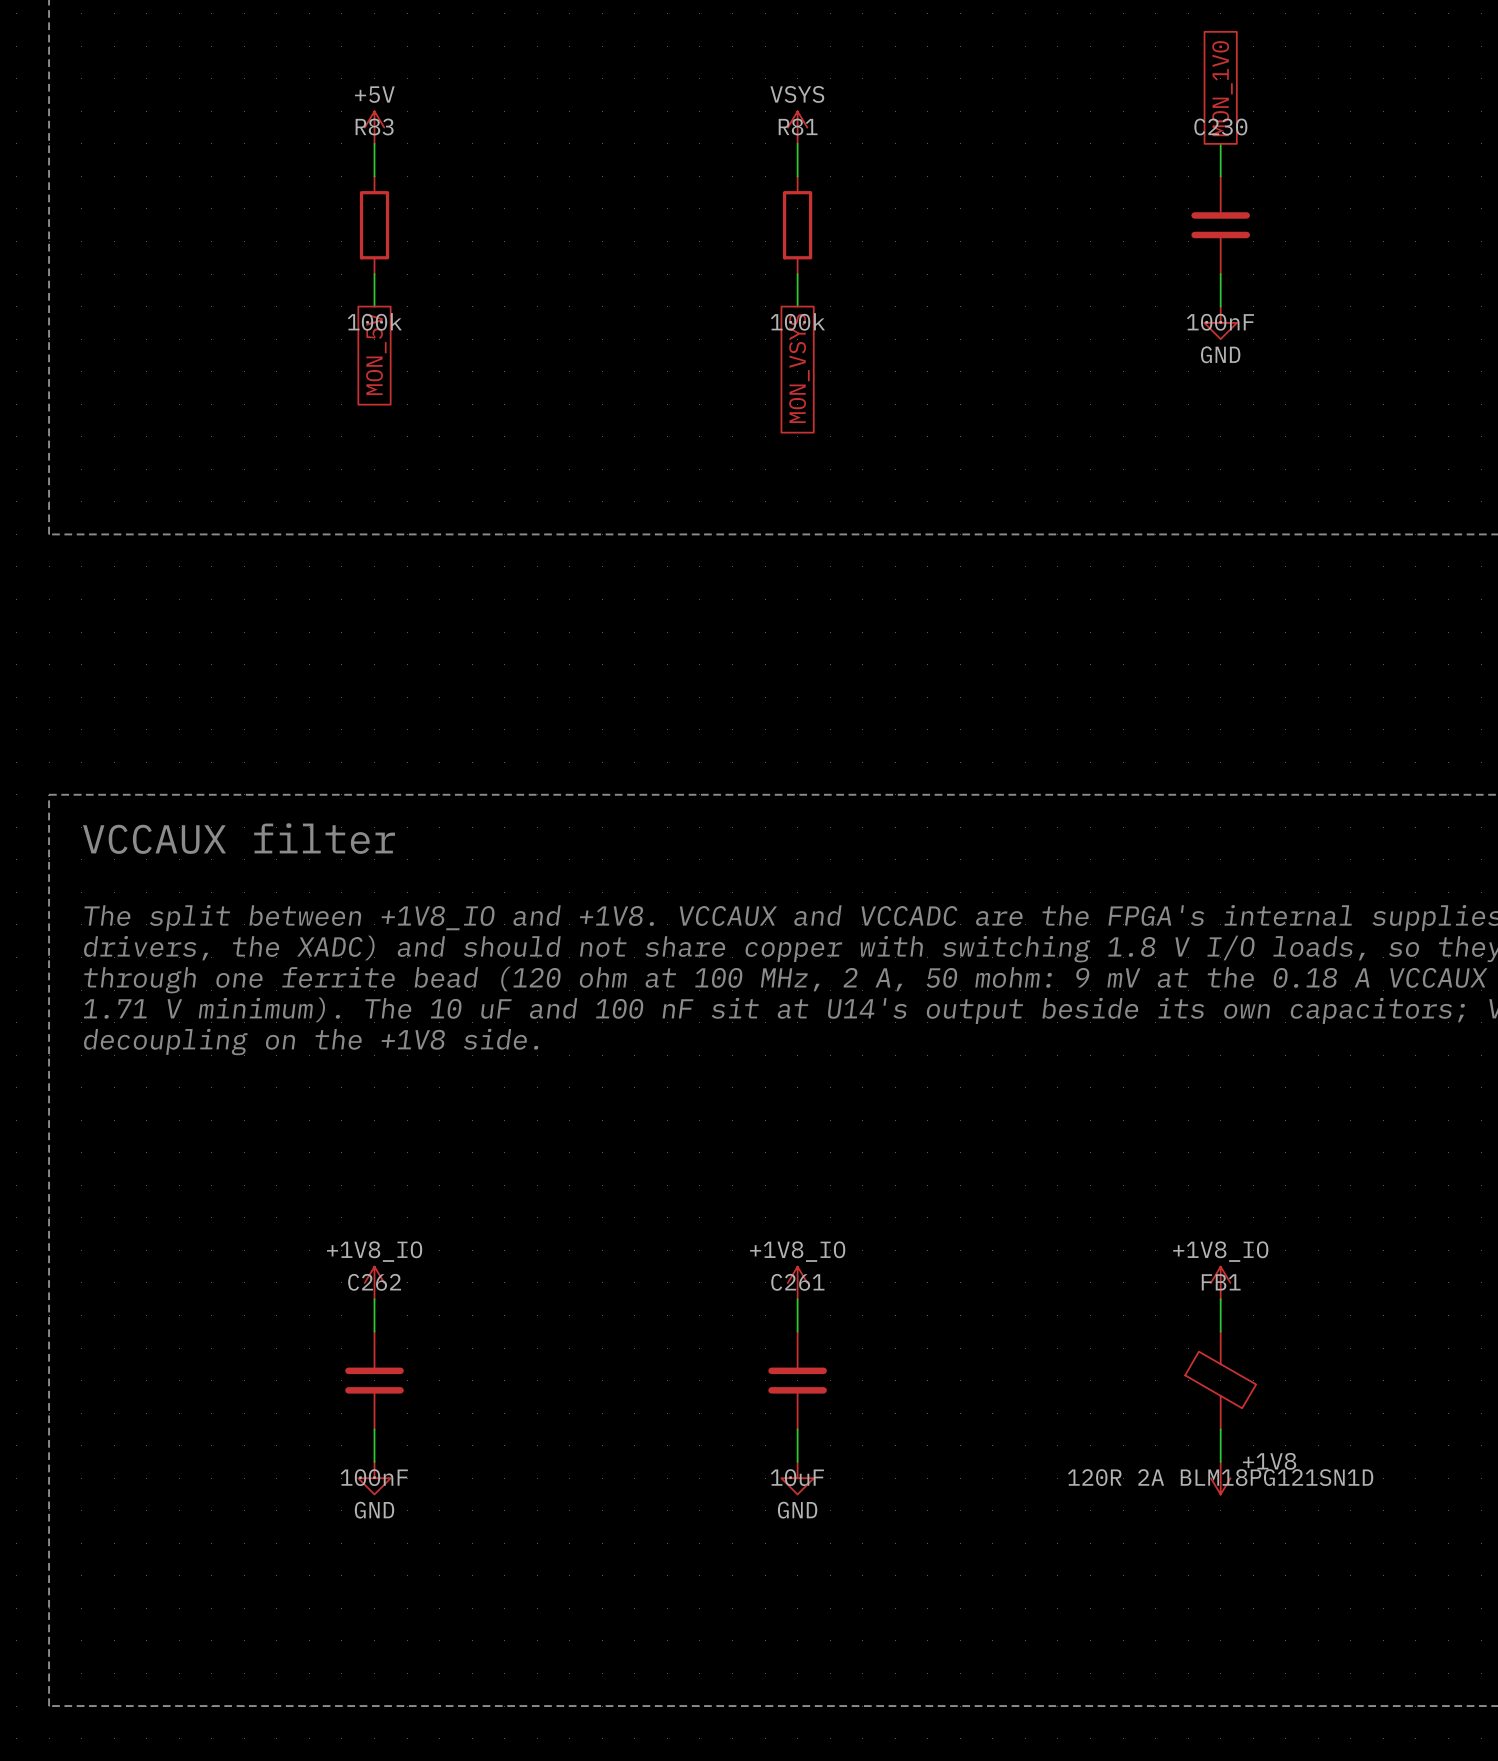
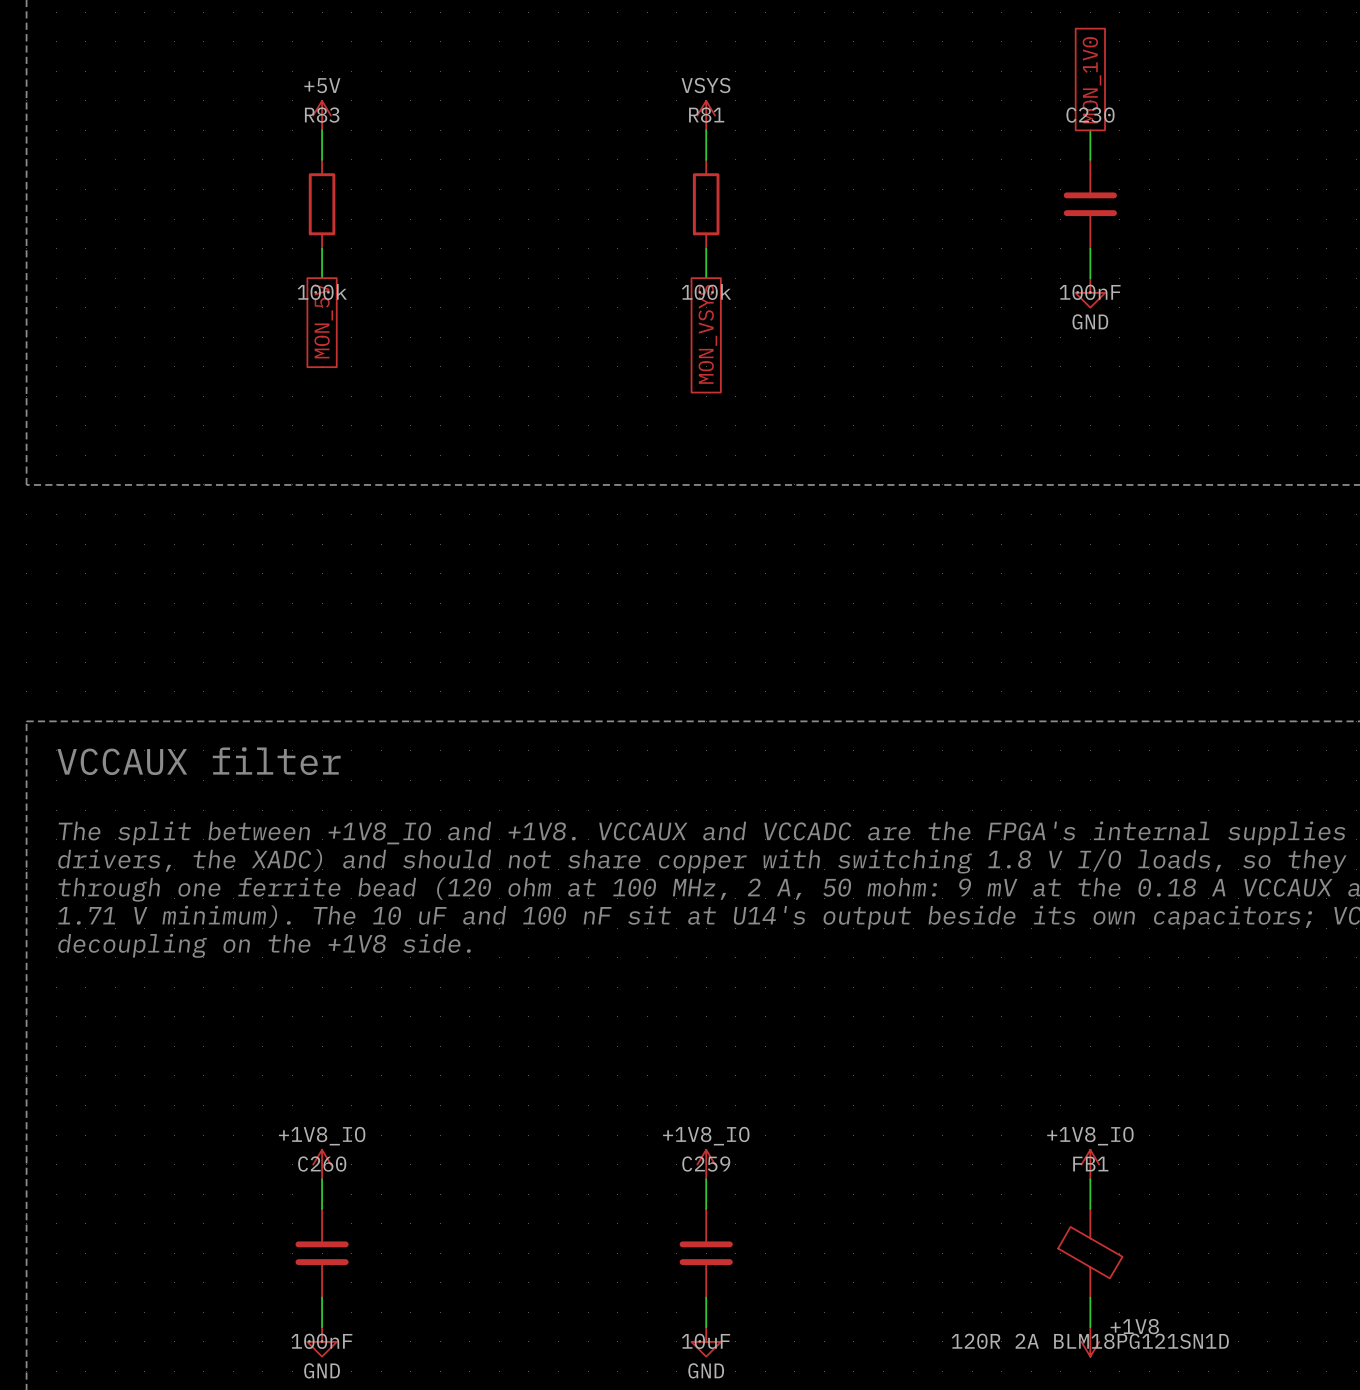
C262 name: C262 (374, 1282) -> C260 (322, 1164)
C261 name: C261 (797, 1282) -> C259 (706, 1164)

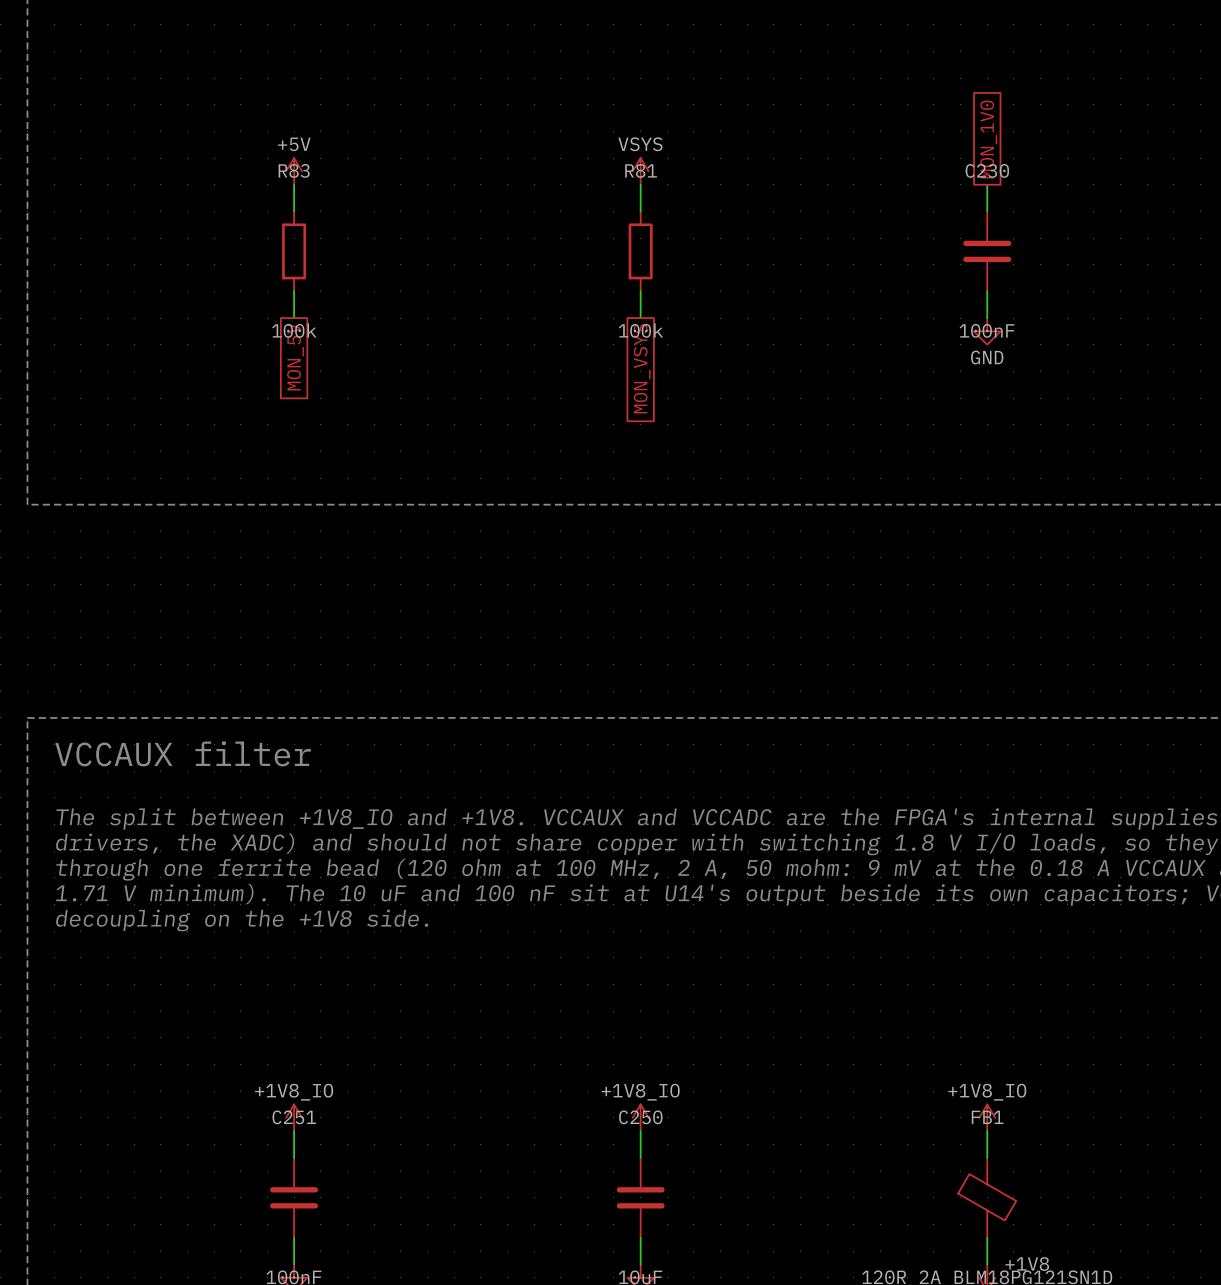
C260 name: C260 (322, 1164) -> C251 (294, 1117)
C259 name: C259 (706, 1164) -> C250 (640, 1117)

